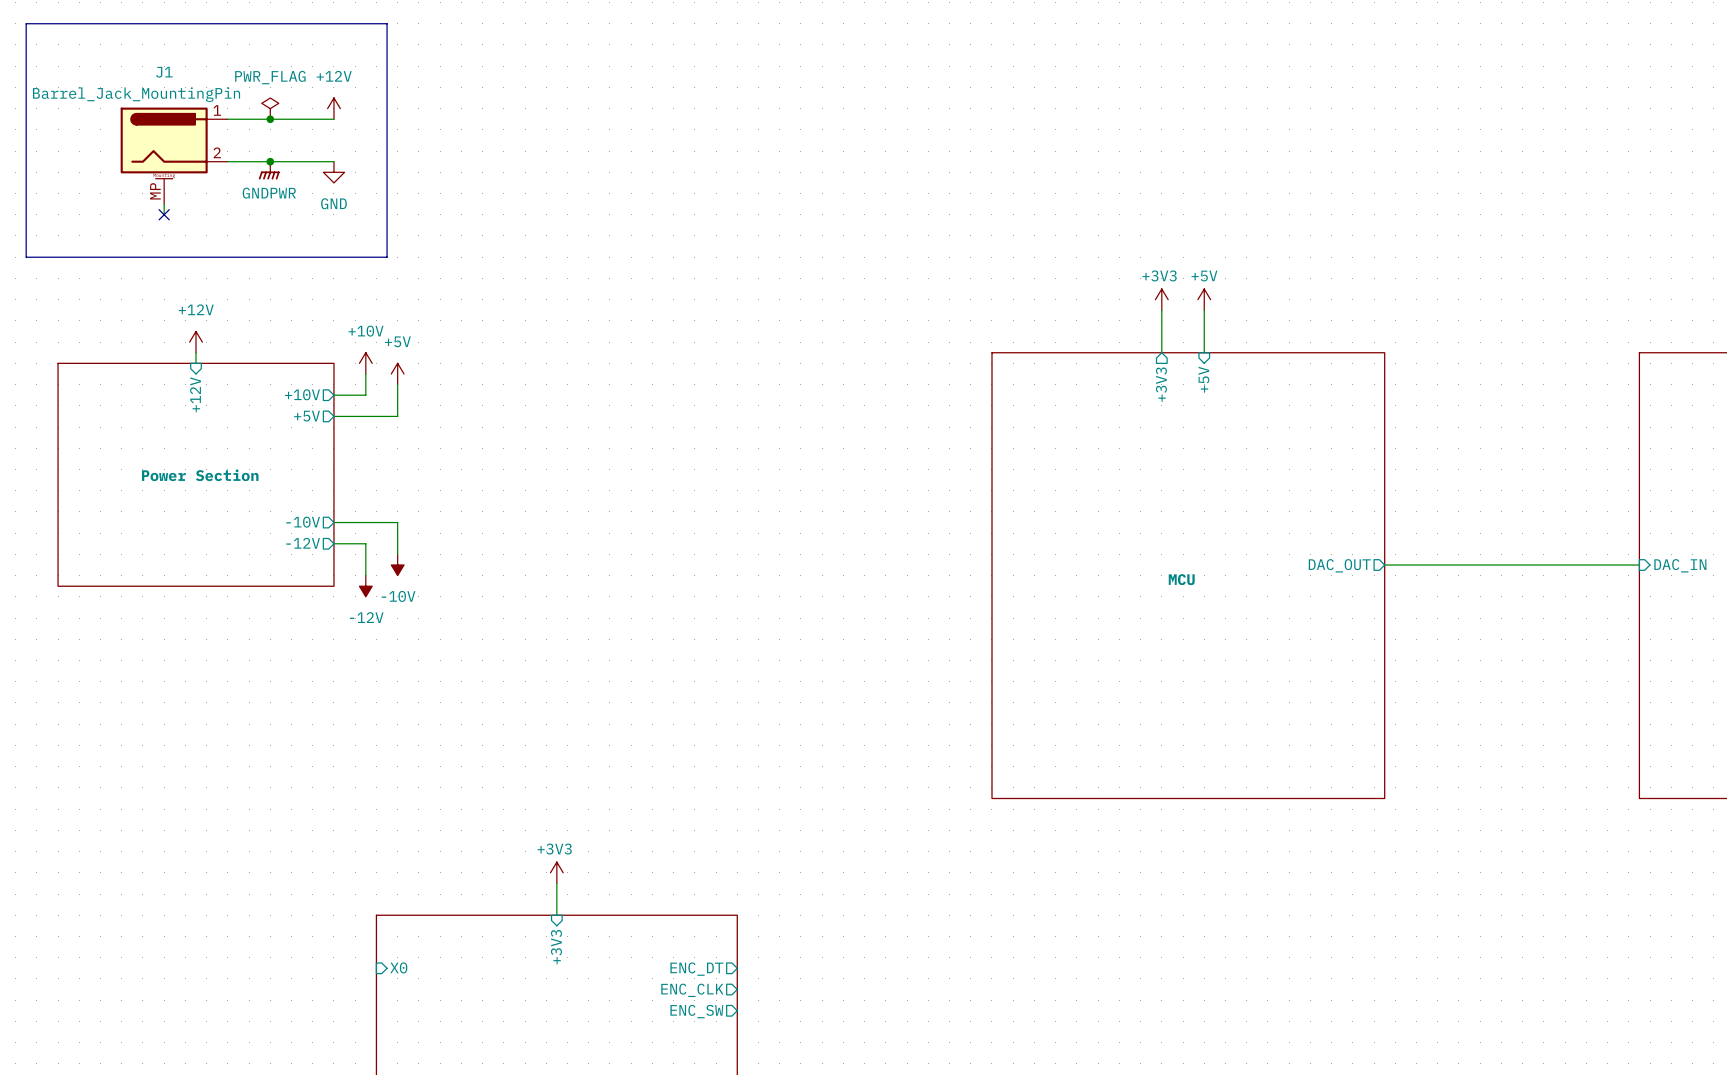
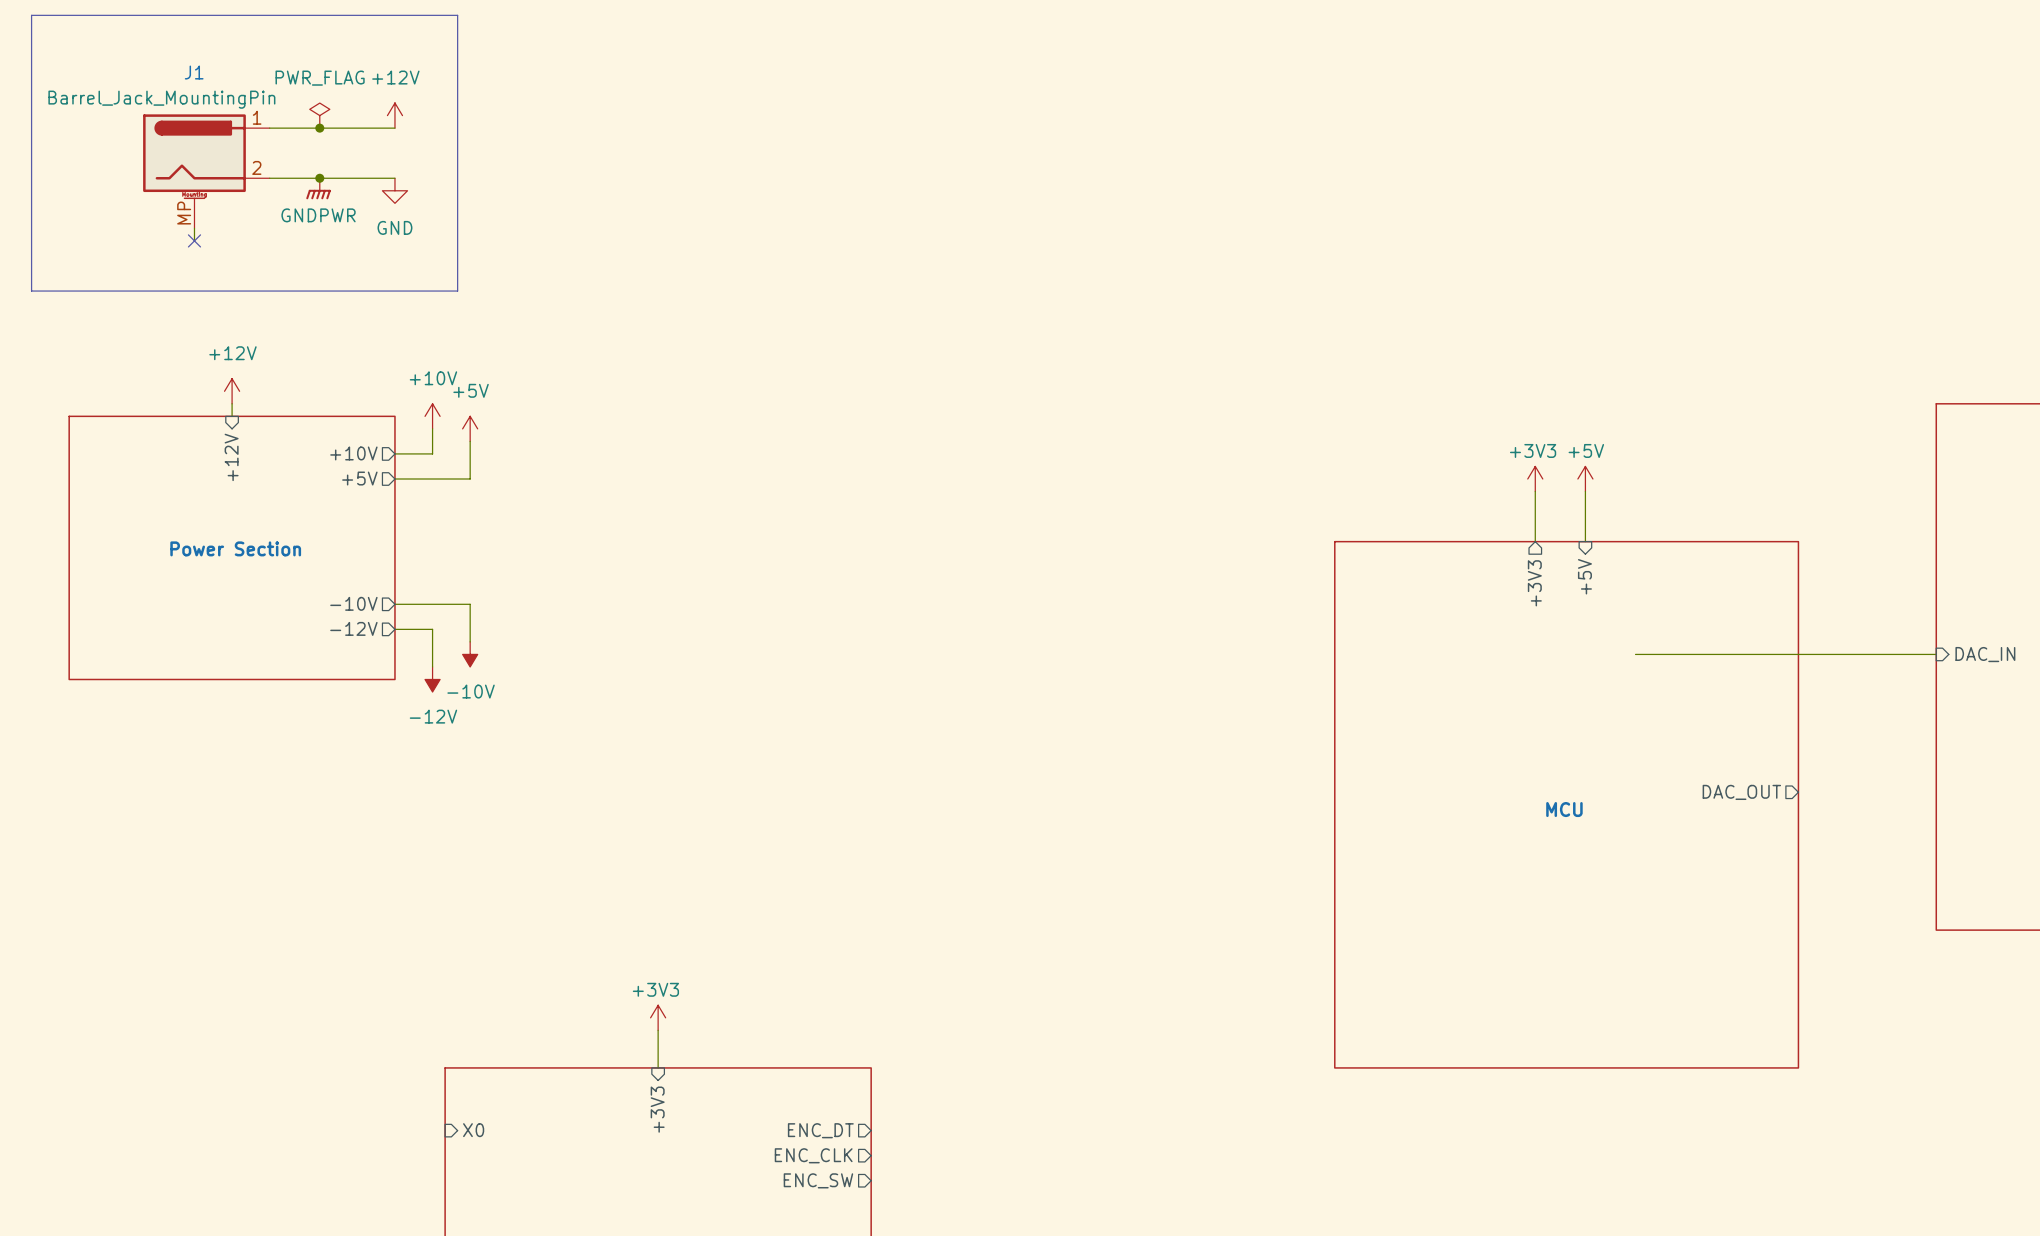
power symbol position: +3V3 (1161, 299) -> +3V3 (1535, 479)
power symbol position: +5V (1204, 299) -> +5V (1585, 479)
wire: (1161, 310) (1161, 352) -> (1535, 491) (1535, 541)
wire: (1204, 310) (1204, 352) -> (1585, 491) (1585, 541)
sheet pin position: +5V (1203, 379) -> +5V (1584, 576)
sheet pin position: +3V3 (1161, 384) -> +3V3 (1534, 583)
sheet pin position: DAC_OUT (1339, 565) -> DAC_OUT (1741, 792)
sheet MCU position: (1188, 575) -> (1566, 804)

